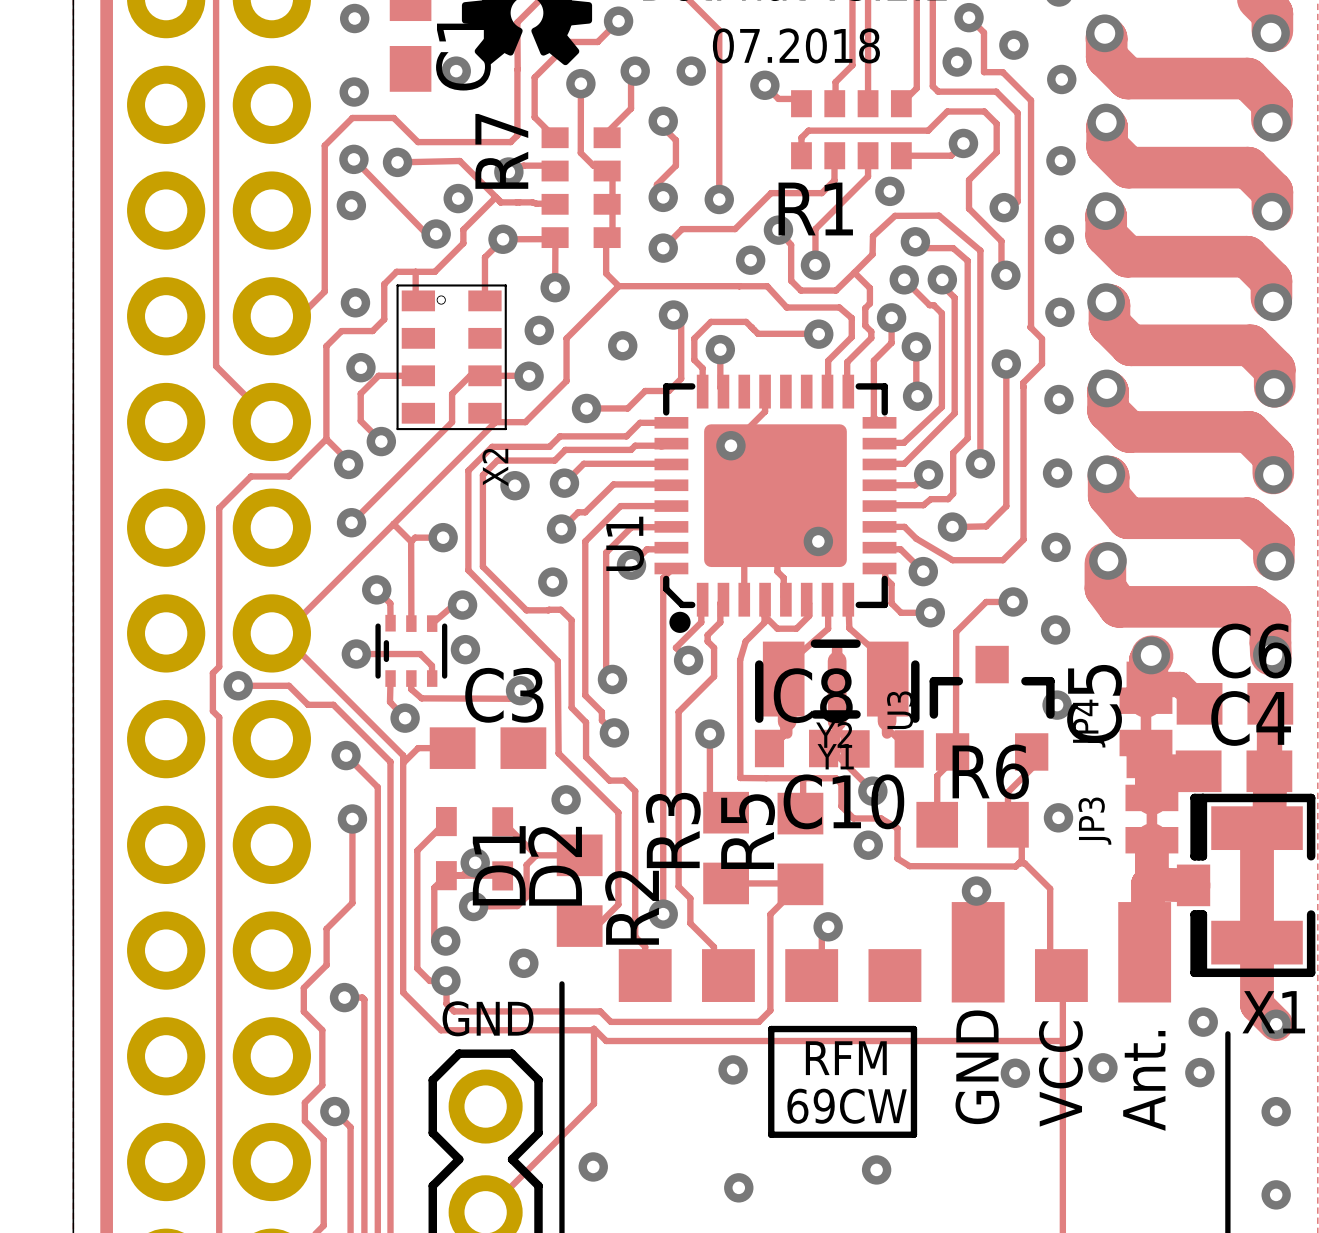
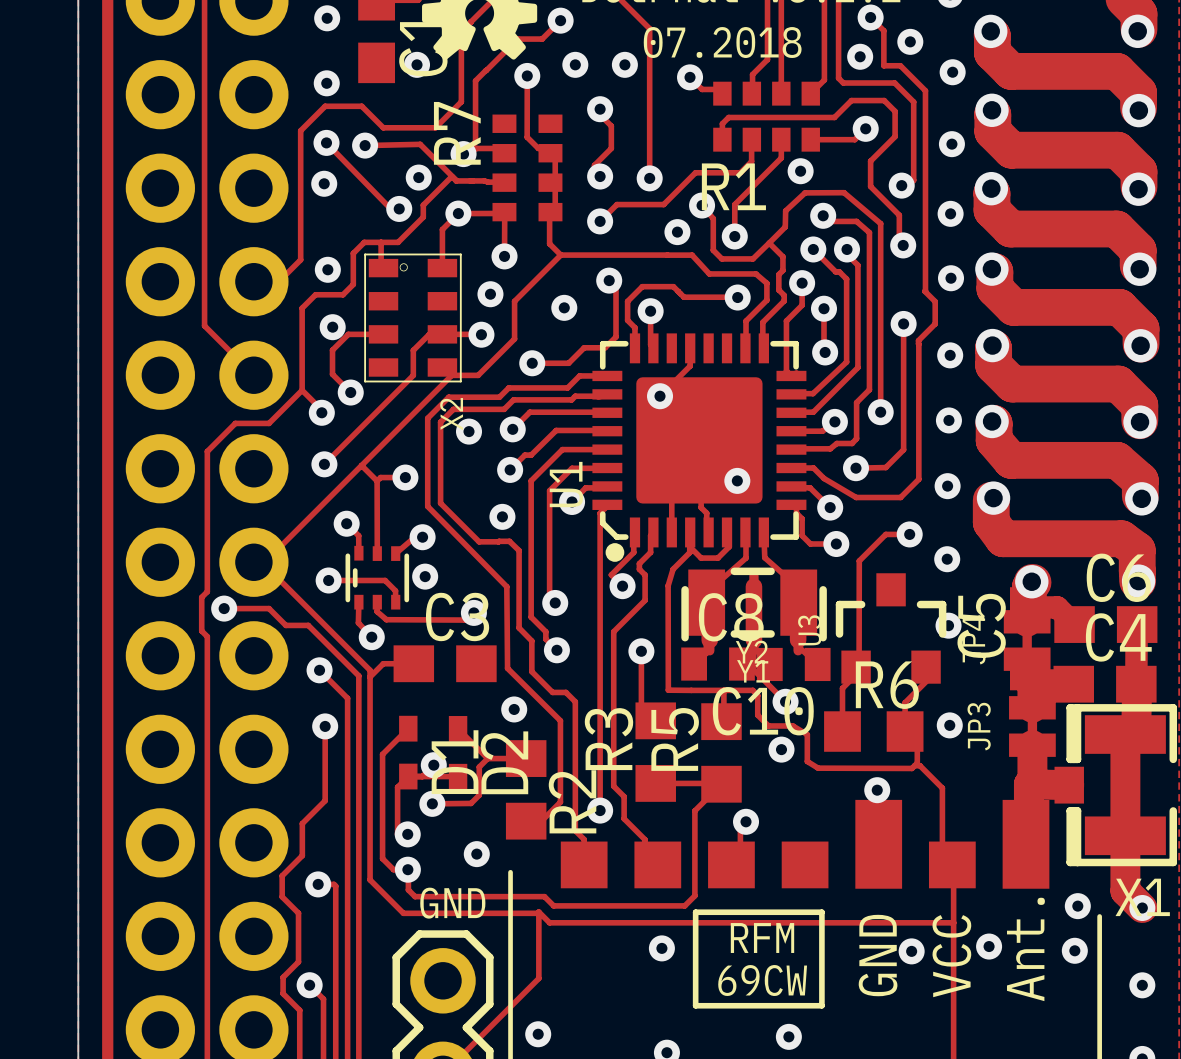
track: (517, 22) (517, 69) -> none
track: (517, 69) (517, 135) (510, 142) (477, 142) -> (471, 21) (461, 31) (461, 101) (435, 127)
track: (635, 71) (631, 75) (631, 108) (607, 132) (607, 137) -> none
track: (534, 77) (534, 117) (555, 137) (549, 133) -> (485, 70) (475, 80) (475, 142) (463, 154)

